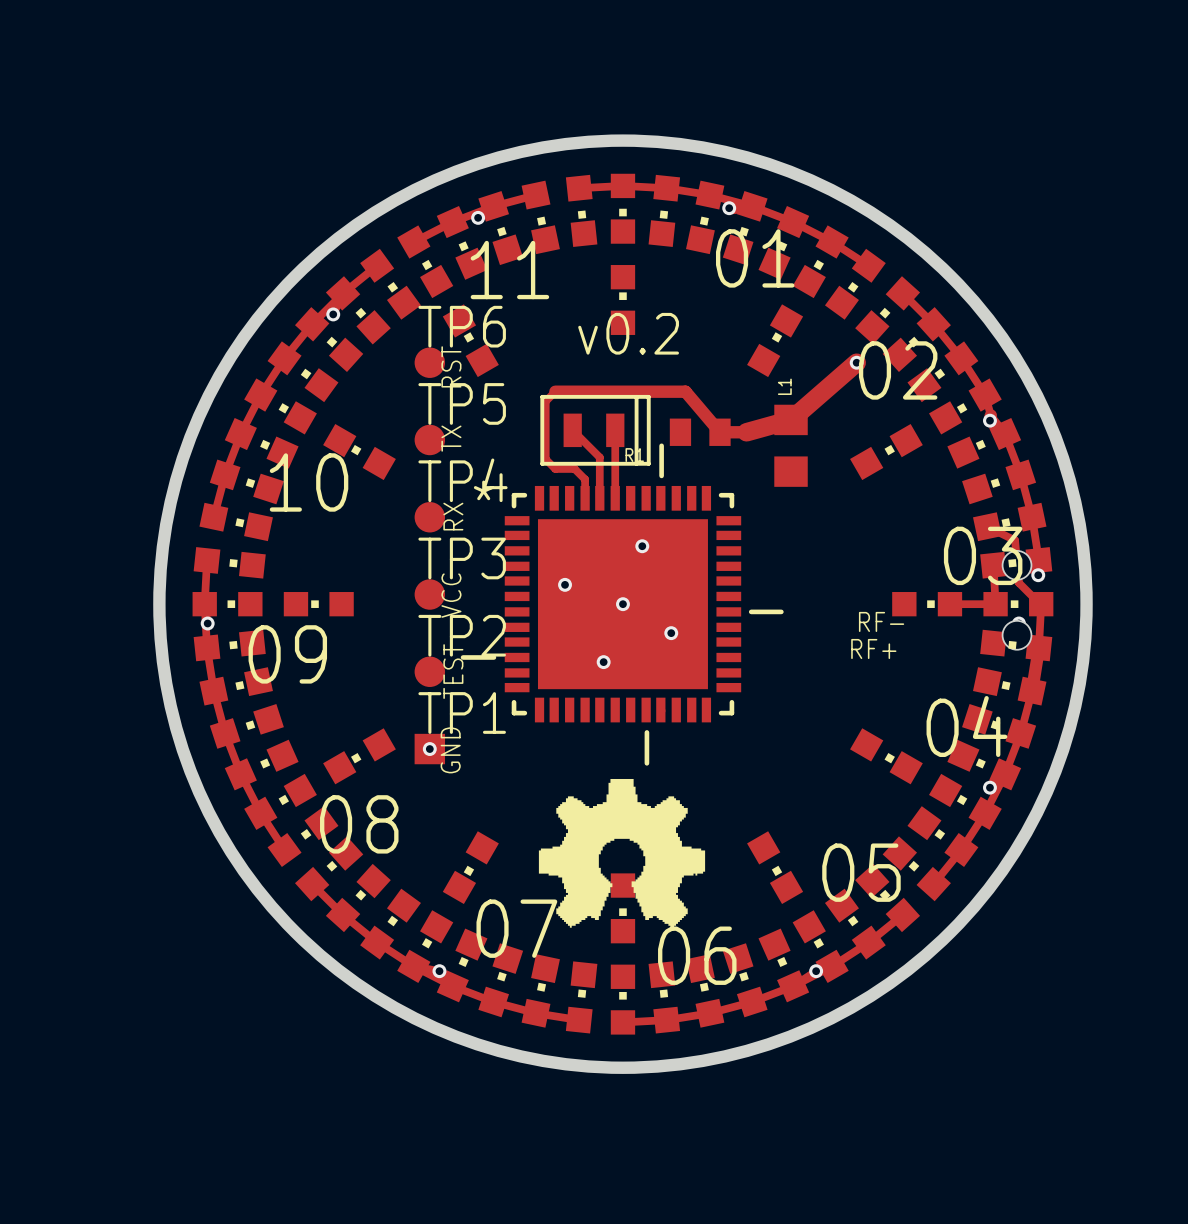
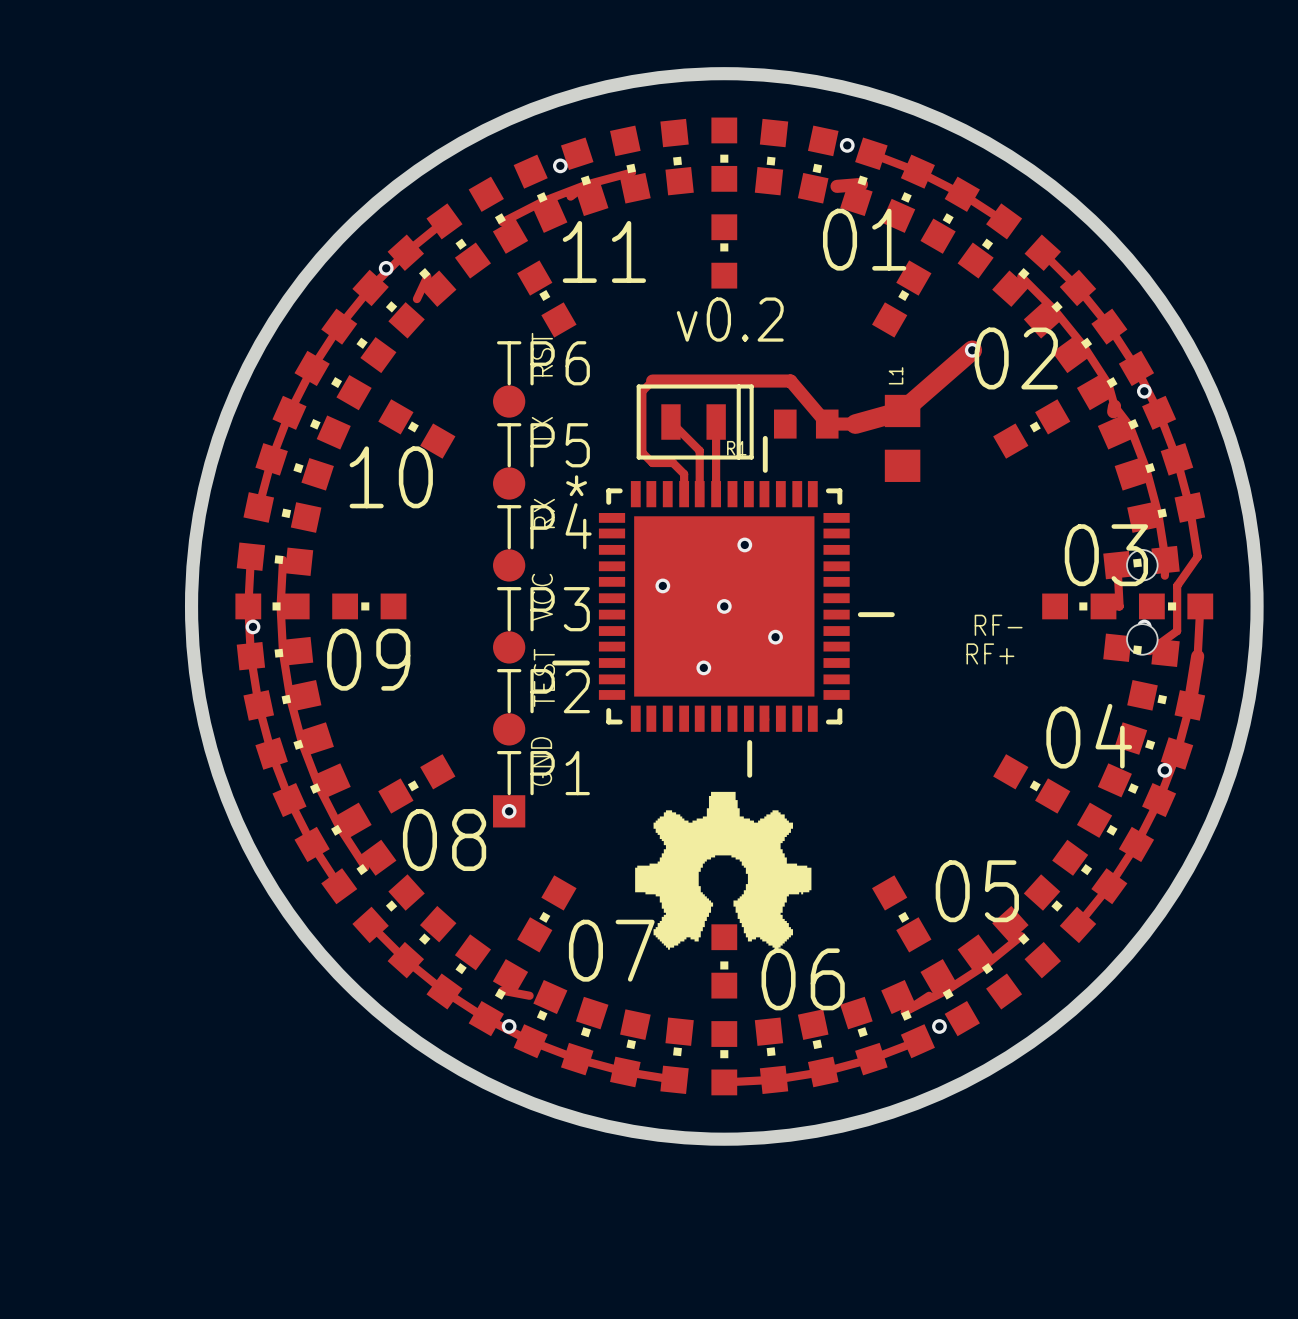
round board edge size: [153, 134, 1093, 1074] -> [184, 67, 1264, 1146]
track: none -> (871, 153) (917, 171) (962, 194) (1004, 221)
part: none -> (724, 154)
track: (579, 188) (622, 185) (666, 188) (709, 195) (752, 206) (793, 222) (832, 241) (868, 265) -> none
part: (622, 208) -> none
via position: (729, 208) -> (847, 145)
part position: (581, 210) -> (677, 157)
part position: (664, 210) -> (771, 157)
via position: (478, 217) -> (560, 165)
part position: (540, 217) -> (630, 164)
part position: (705, 217) -> (818, 164)
part position: (500, 228) -> (584, 176)
part position: (745, 228) -> (863, 176)
part: none -> (498, 215)
part: none -> (950, 215)
track: none -> (444, 221) (405, 252) (370, 287) (339, 326) (312, 368) (289, 412) (271, 459) (258, 507)
part position: (462, 242) -> (540, 193)
part position: (783, 242) -> (908, 193)
part: (425, 261) -> none
part: (820, 261) -> none
track: (377, 265) (343, 293) (312, 324) (284, 358) (260, 395) (240, 434) (225, 474) (213, 517) -> none
part: none -> (724, 251)
track: none -> (1042, 252) (1078, 287) (1109, 326) (1136, 368) (1159, 412) (1176, 459) (1189, 507) (1197, 556) (1177, 585) (1177, 631) (1149, 651)
part position: (390, 284) -> (458, 240)
part position: (855, 284) -> (989, 240)
part: (622, 299) -> none
part position: (358, 310) -> (422, 270)
part position: (887, 310) -> (1026, 270)
via position: (333, 314) -> (386, 268)
part: none -> (546, 298)
part: none -> (901, 298)
part position: (329, 339) -> (388, 304)
part position: (916, 339) -> (1060, 304)
part: (470, 340) -> none
part: (775, 340) -> none
TP6 position: (429, 362) -> (509, 401)
part position: (303, 371) -> (358, 340)
part position: (942, 371) -> (1089, 340)
part: none -> (333, 380)
part: none -> (1115, 380)
part: (280, 406) -> none
part: (965, 406) -> none
via position: (989, 420) -> (1144, 391)
part: none -> (416, 428)
part: none -> (1031, 428)
TP5 position: (429, 439) -> (509, 483)
part position: (261, 443) -> (311, 422)
part position: (984, 443) -> (1136, 422)
part: (359, 452) -> none
part: (886, 452) -> none
part position: (246, 481) -> (294, 466)
part position: (999, 481) -> (1153, 466)
TP4 position: (429, 517) -> (509, 565)
part position: (236, 521) -> (282, 512)
part position: (1009, 521) -> (1166, 512)
track: (987, 526) (1015, 540) (1018, 582) (1041, 604) (1038, 647) (1032, 691) (1020, 733) (1005, 774) -> none
track: none -> (250, 556) (248, 606)
part position: (229, 562) -> (274, 559)
via: (1038, 575) -> none
TP3 position: (429, 594) -> (509, 647)
track: none -> (248, 606) (250, 656) (258, 705) (271, 753) (289, 800) (312, 844) (339, 886)
part: none -> (272, 606)
part: (227, 604) -> none
part: none -> (369, 606)
part: (318, 604) -> none
part: (927, 604) -> none
track: (949, 604) (980, 604) -> none
part: none -> (1079, 606)
part: (1018, 604) -> none
part: none -> (1176, 606)
track: none -> (1200, 606) (1197, 656) (1189, 705) (1176, 753) (1159, 800) (1136, 844) (1109, 886) (1078, 924)
via position: (207, 623) -> (253, 626)
part position: (229, 645) -> (274, 653)
TP2 position: (429, 671) -> (509, 729)
part position: (236, 686) -> (282, 700)
part position: (1009, 686) -> (1166, 700)
part position: (246, 726) -> (294, 746)
part position: (999, 726) -> (1153, 746)
TP1 position: (429, 749) -> (509, 811)
via position: (429, 749) -> (509, 811)
part: (359, 756) -> none
part: (886, 756) -> none
part position: (261, 765) -> (311, 790)
part position: (984, 765) -> (1136, 790)
part: none -> (416, 783)
part: none -> (1031, 783)
track: (1005, 774) (985, 813) (961, 849) (933, 884) -> none
via position: (989, 787) -> (1164, 770)
part: (280, 801) -> none
part: (965, 801) -> none
part: none -> (333, 832)
part: none -> (1115, 832)
part position: (303, 836) -> (358, 872)
part position: (942, 836) -> (1089, 872)
part: (470, 867) -> none
part: (775, 867) -> none
part position: (329, 868) -> (388, 908)
part position: (916, 868) -> (1060, 908)
track: (312, 884) (343, 914) (377, 942) (413, 966) (452, 986) (493, 1001) (536, 1013) (579, 1020) -> none
part: none -> (546, 913)
part: none -> (901, 913)
part position: (358, 898) -> (422, 942)
part position: (887, 898) -> (1026, 942)
track: none -> (370, 924) (405, 960) (444, 991) (486, 1018) (530, 1041) (577, 1059) (625, 1071) (674, 1079)
part: (622, 908) -> none
part position: (390, 924) -> (458, 971)
part position: (855, 924) -> (989, 971)
part: none -> (724, 961)
part: (425, 946) -> none
part: (820, 946) -> none
part position: (462, 965) -> (540, 1019)
part position: (783, 965) -> (908, 1019)
via position: (439, 971) -> (509, 1026)
via position: (816, 971) -> (939, 1026)
part: none -> (498, 997)
part: none -> (950, 997)
part position: (500, 980) -> (584, 1036)
part position: (745, 980) -> (863, 1036)
track: (793, 986) (752, 1001) (709, 1013) (666, 1020) (622, 1022) -> none
part position: (540, 990) -> (630, 1048)
part position: (705, 990) -> (818, 1048)
part position: (581, 997) -> (677, 1055)
part position: (664, 997) -> (771, 1055)
part: (622, 999) -> none
track: none -> (917, 1041) (871, 1059) (823, 1071) (774, 1079) (724, 1082)
part: none -> (724, 1058)

